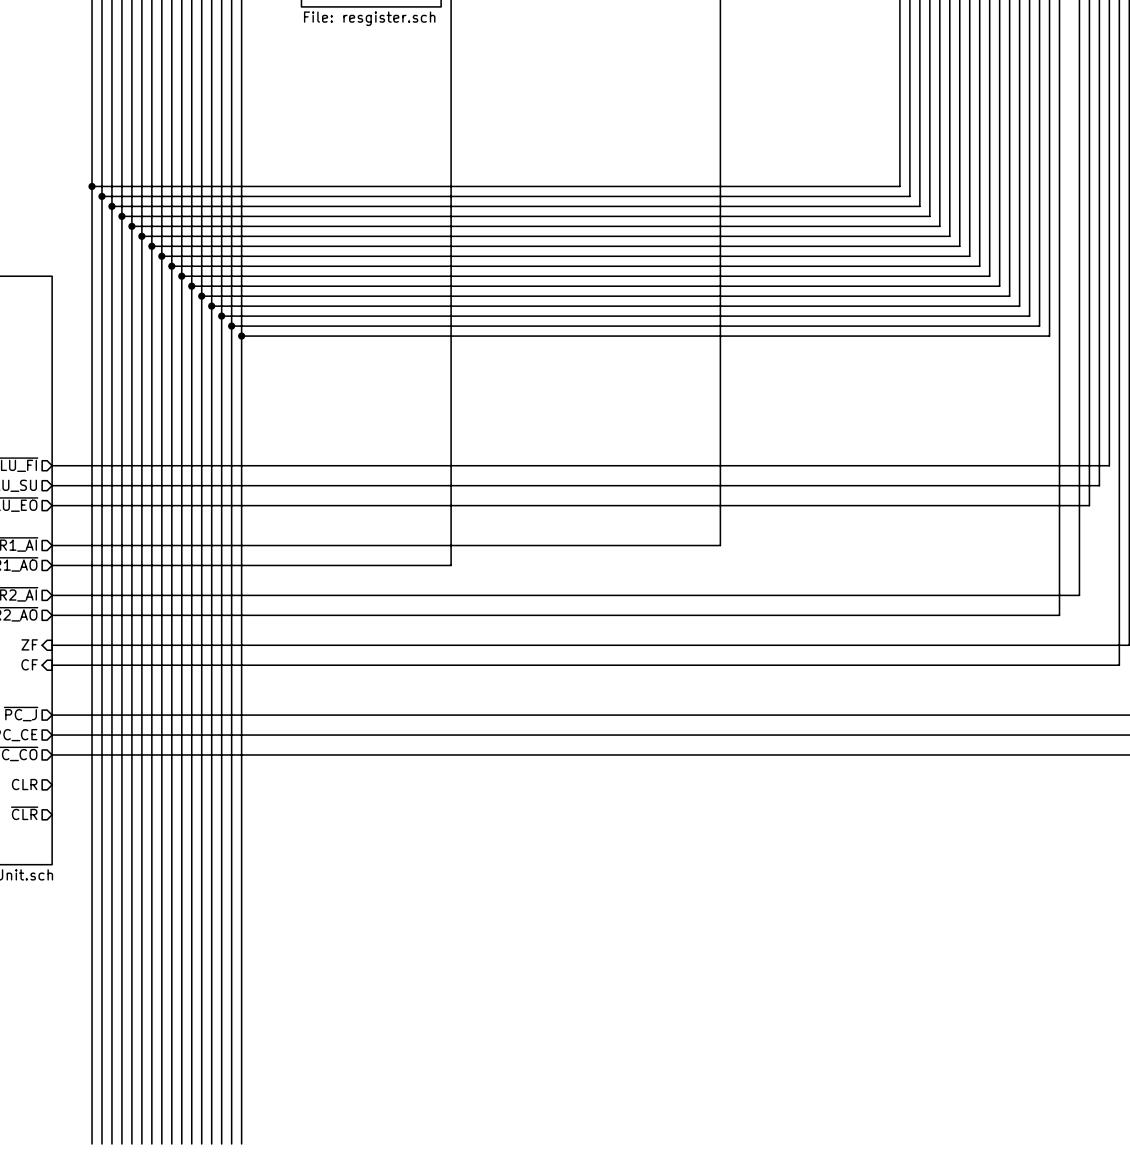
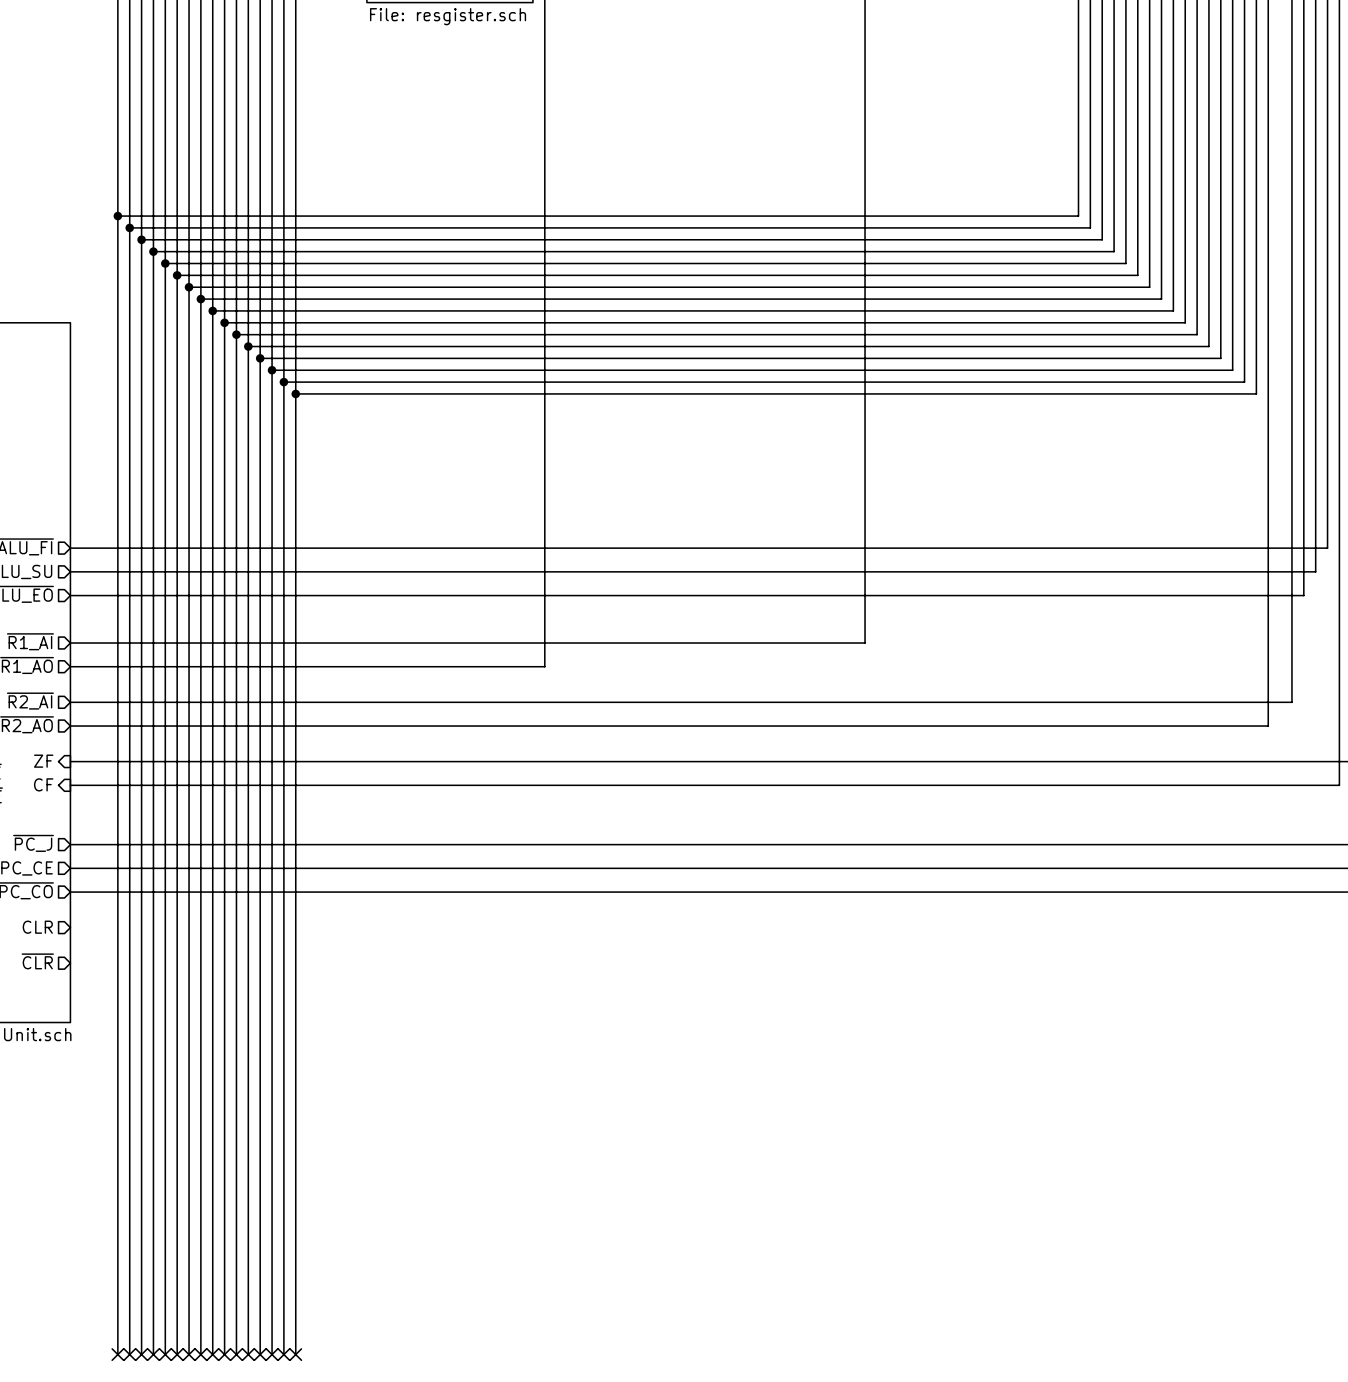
no-connect mark: none -> (117, 1354)
no-connect mark: none -> (129, 1354)
no-connect mark: none -> (141, 1354)
no-connect mark: none -> (153, 1354)
no-connect mark: none -> (165, 1354)
no-connect mark: none -> (177, 1354)
no-connect mark: none -> (189, 1354)
no-connect mark: none -> (200, 1354)
no-connect mark: none -> (212, 1354)
no-connect mark: none -> (224, 1354)
no-connect mark: none -> (236, 1354)
no-connect mark: none -> (248, 1354)
no-connect mark: none -> (260, 1354)
no-connect mark: none -> (272, 1354)
no-connect mark: none -> (283, 1354)
no-connect mark: none -> (295, 1354)

